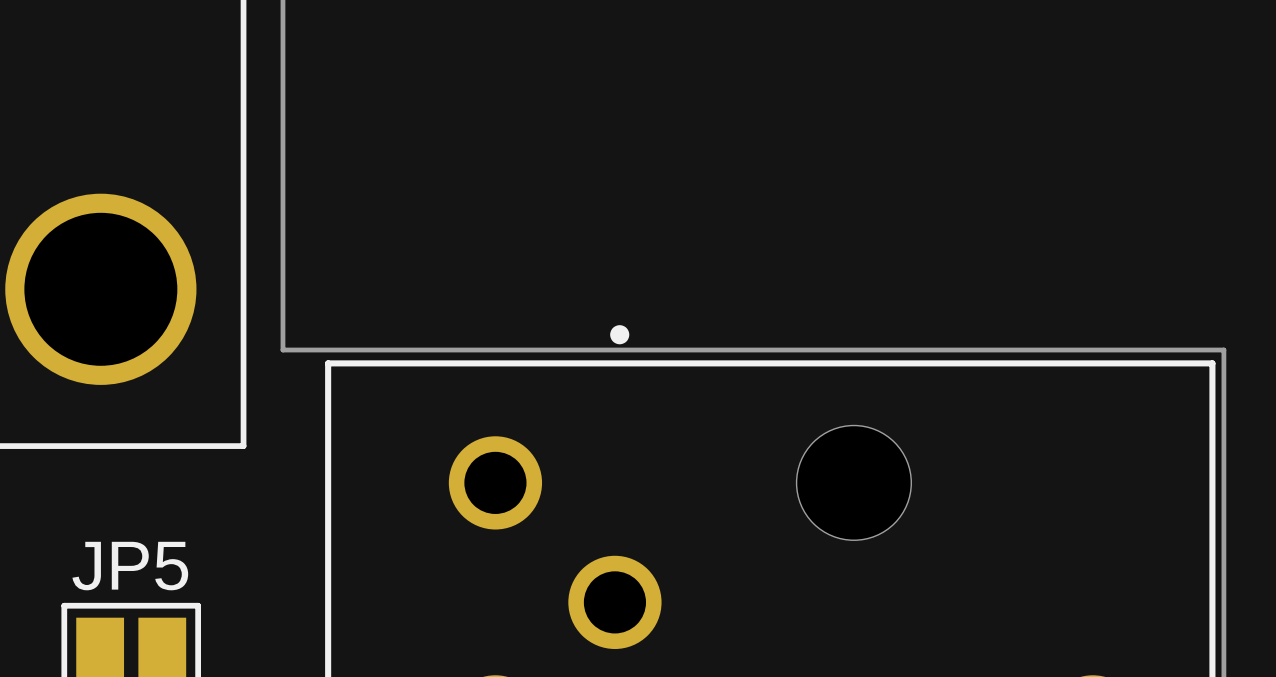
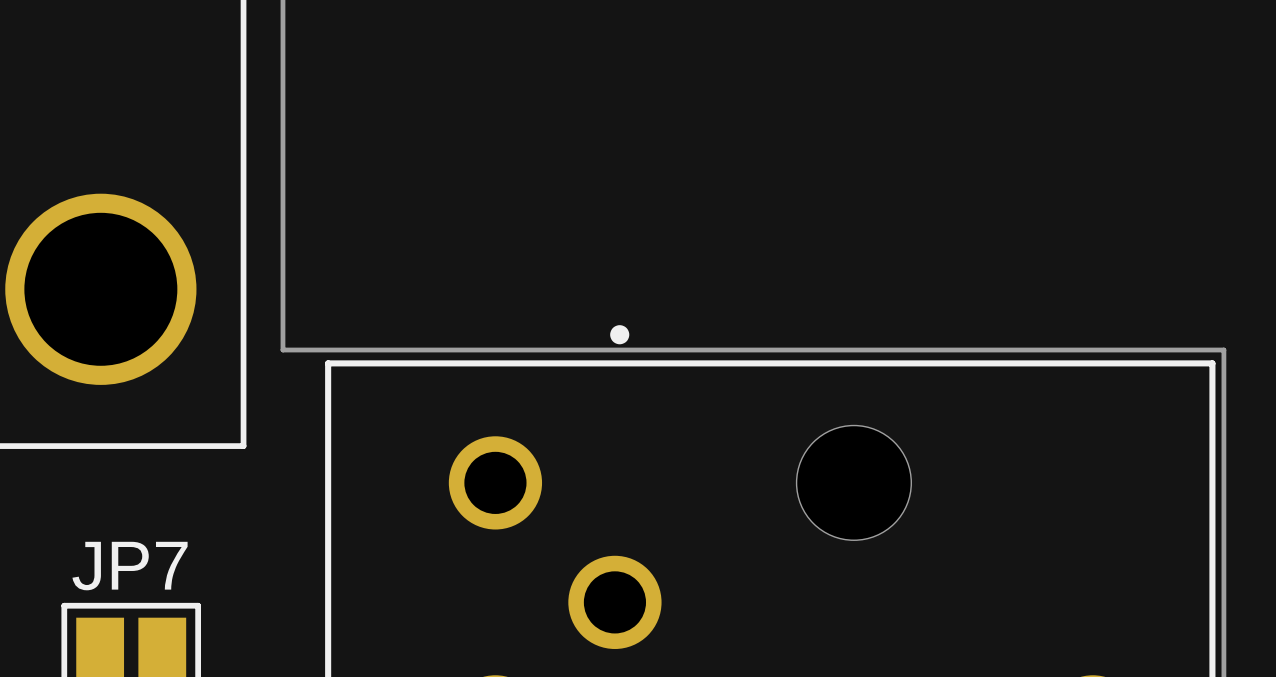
JP5 name: JP5 (130, 566) -> JP7 (130, 566)

